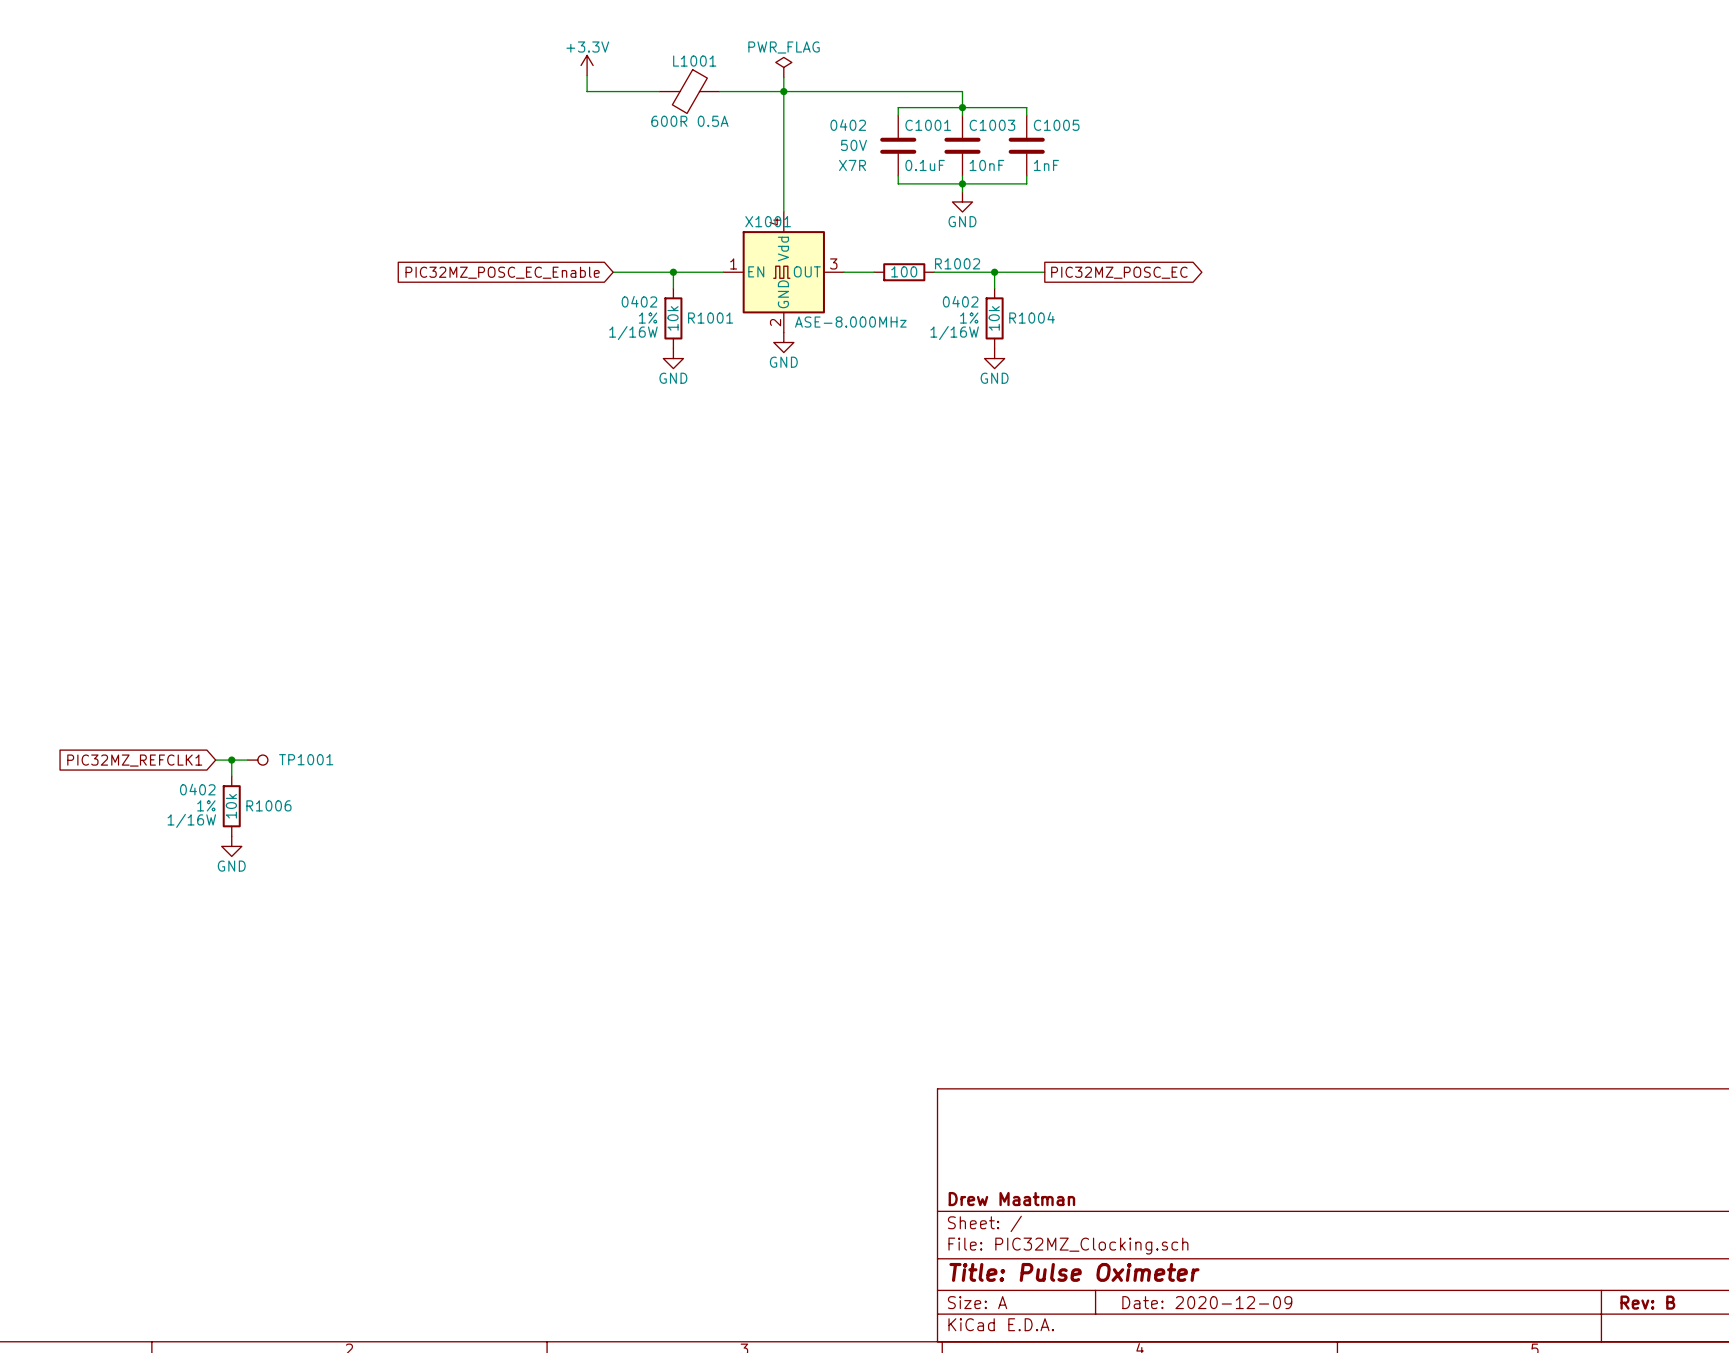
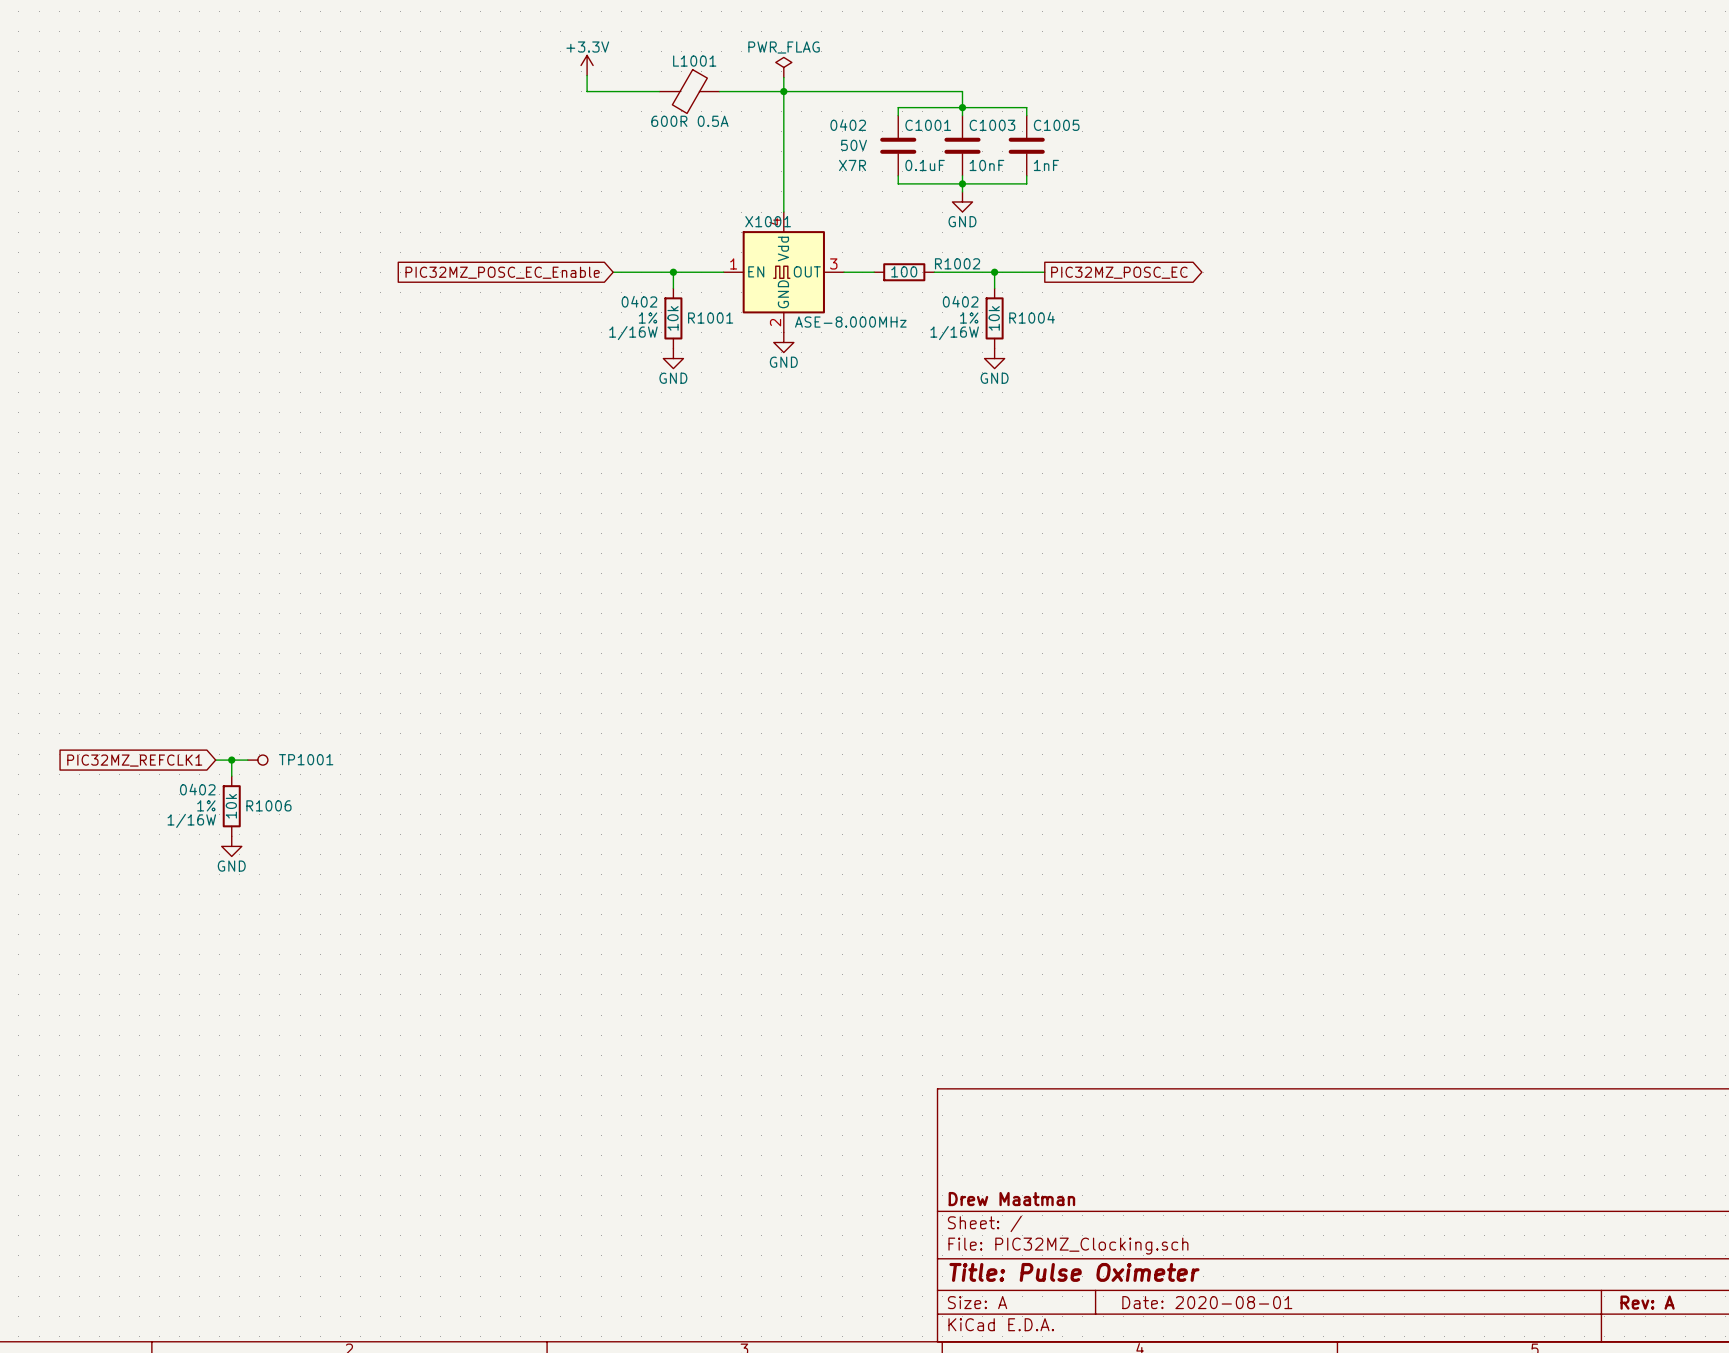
title block: Date: 2020-12-09 (1207, 1302) -> Date: 2020-08-01 (1207, 1302)
title block: Rev: B (1647, 1302) -> Rev: A (1647, 1302)

